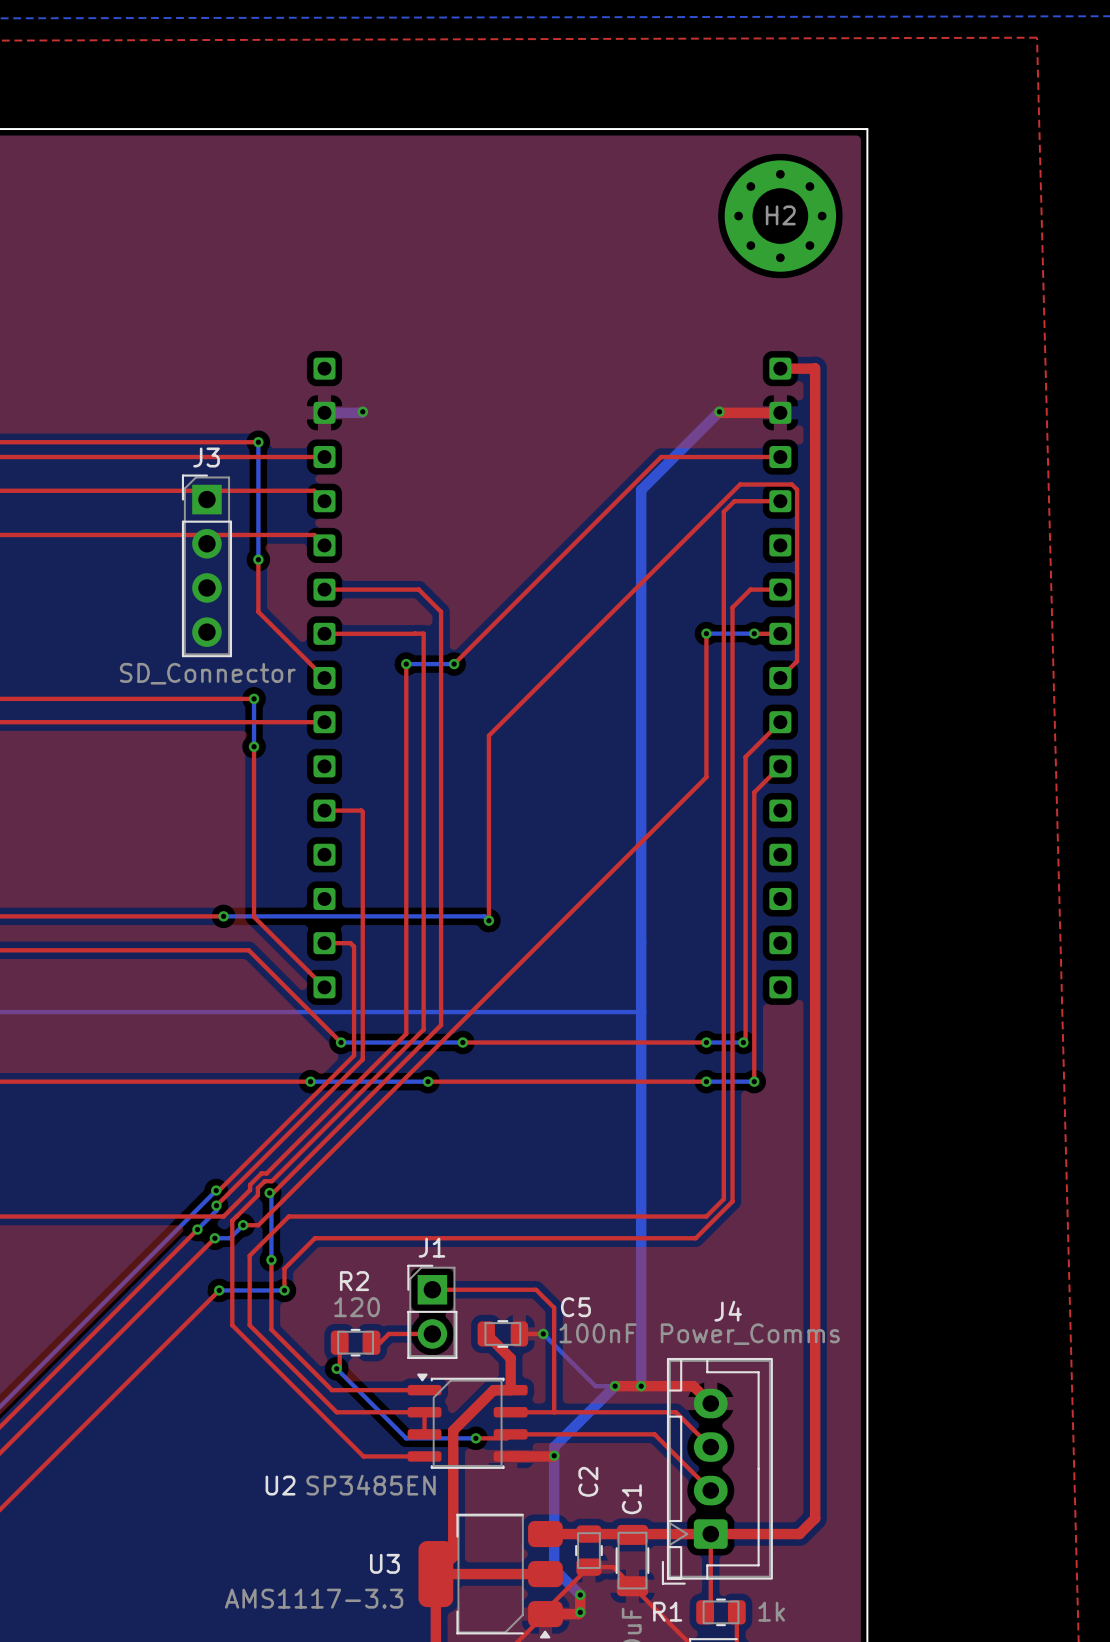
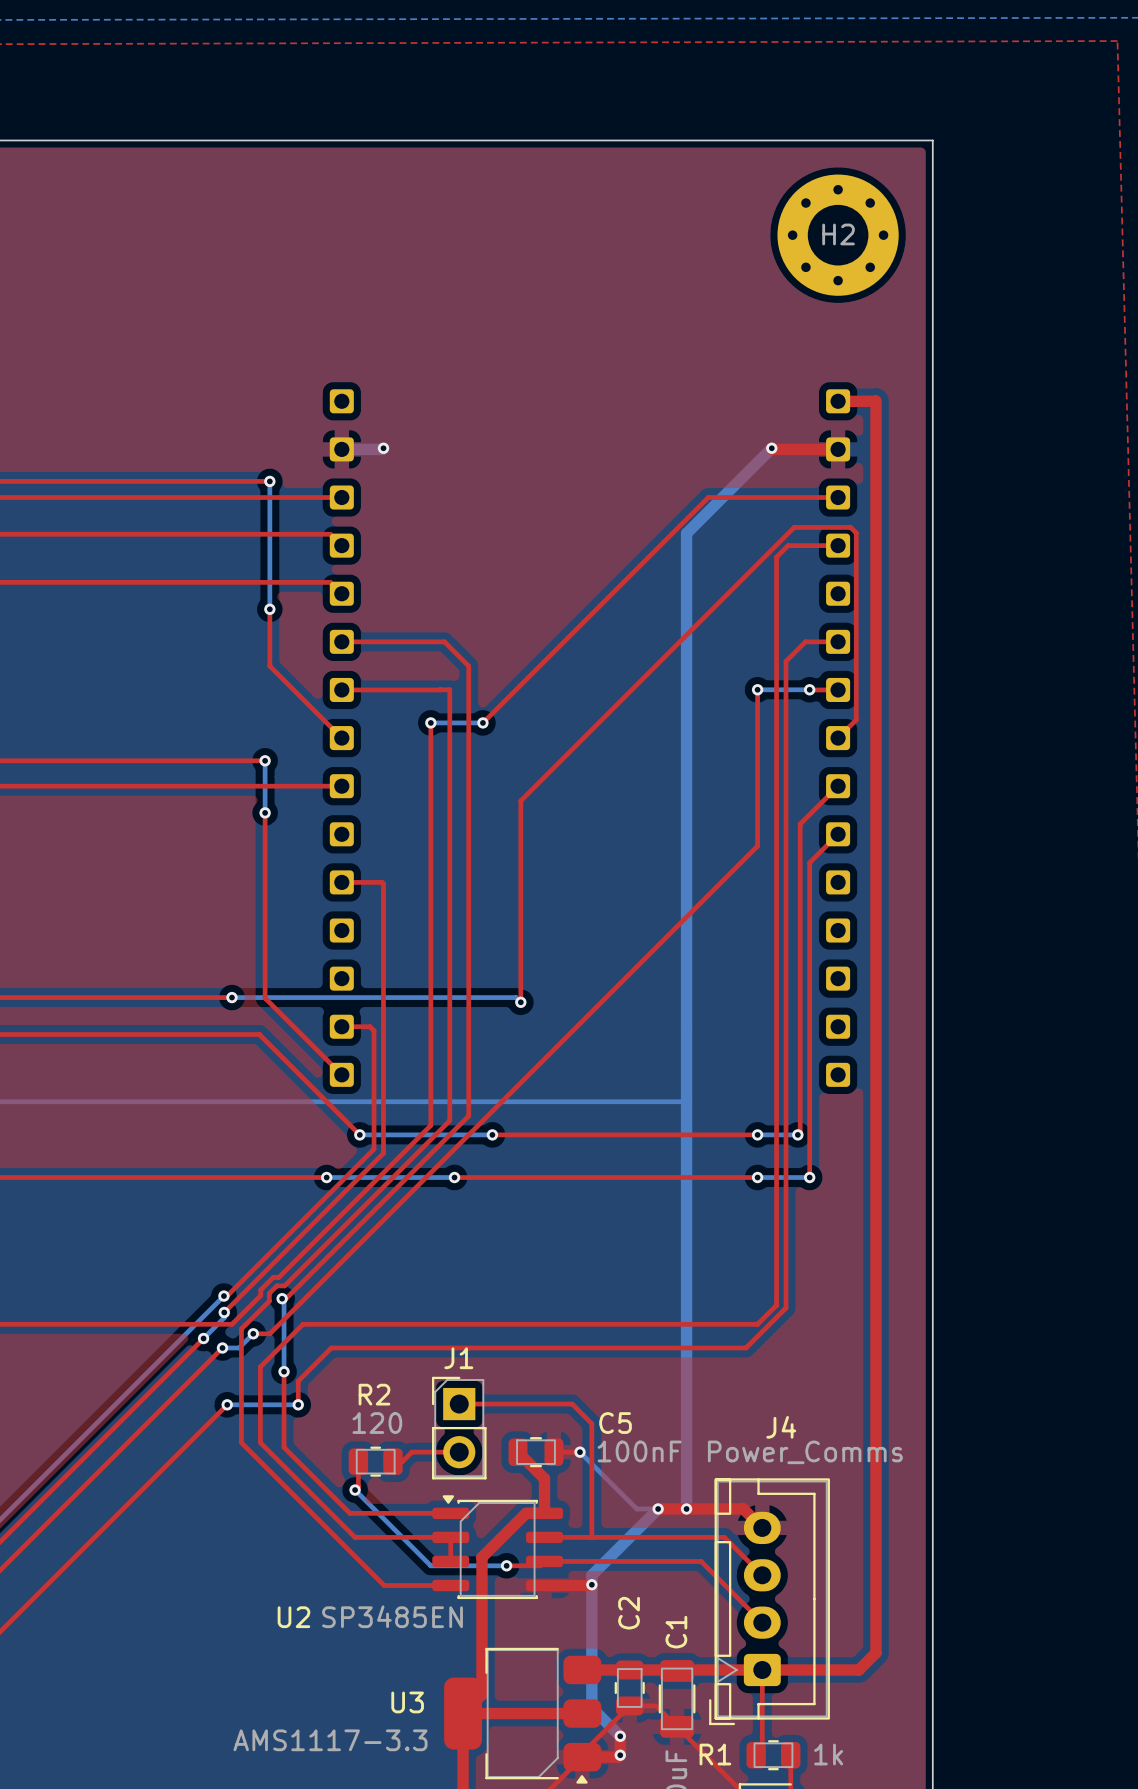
J3: SD_Connector (206, 565) -> none

